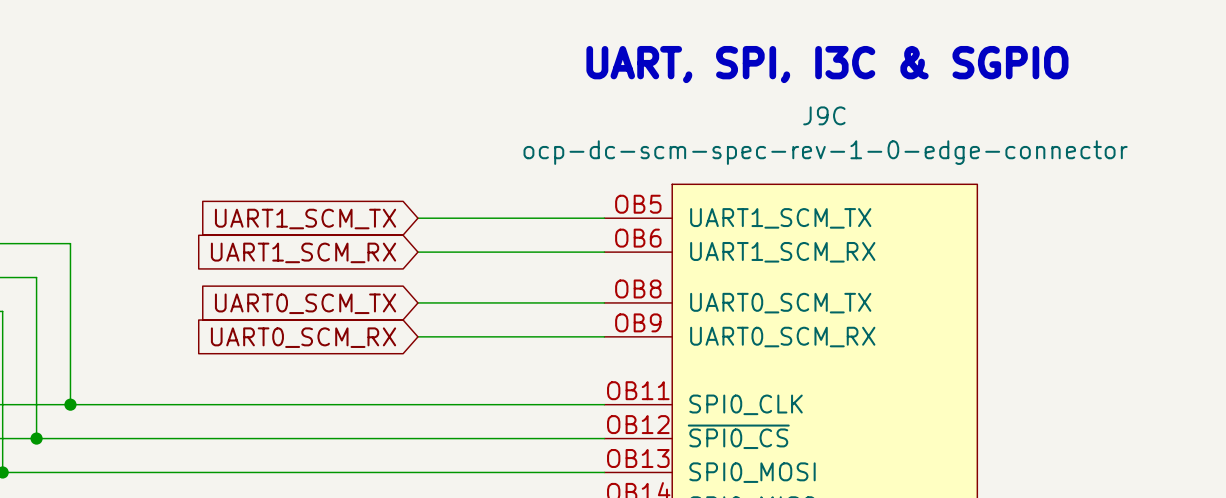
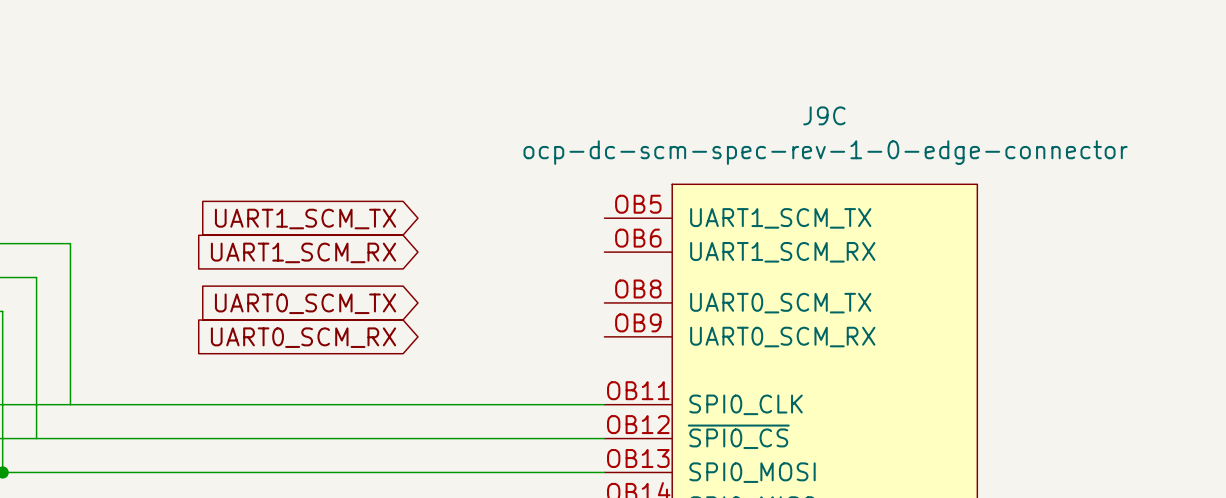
text: UART, SPI, I3C & SGPIO (827, 64) -> none
wire: (417, 218) (604, 218) -> none
wire: (417, 252) (604, 252) -> none
wire: (417, 302) (604, 302) -> none
wire: (417, 336) (604, 336) -> none
junction: (70, 404) -> none
junction: (36, 438) -> none

